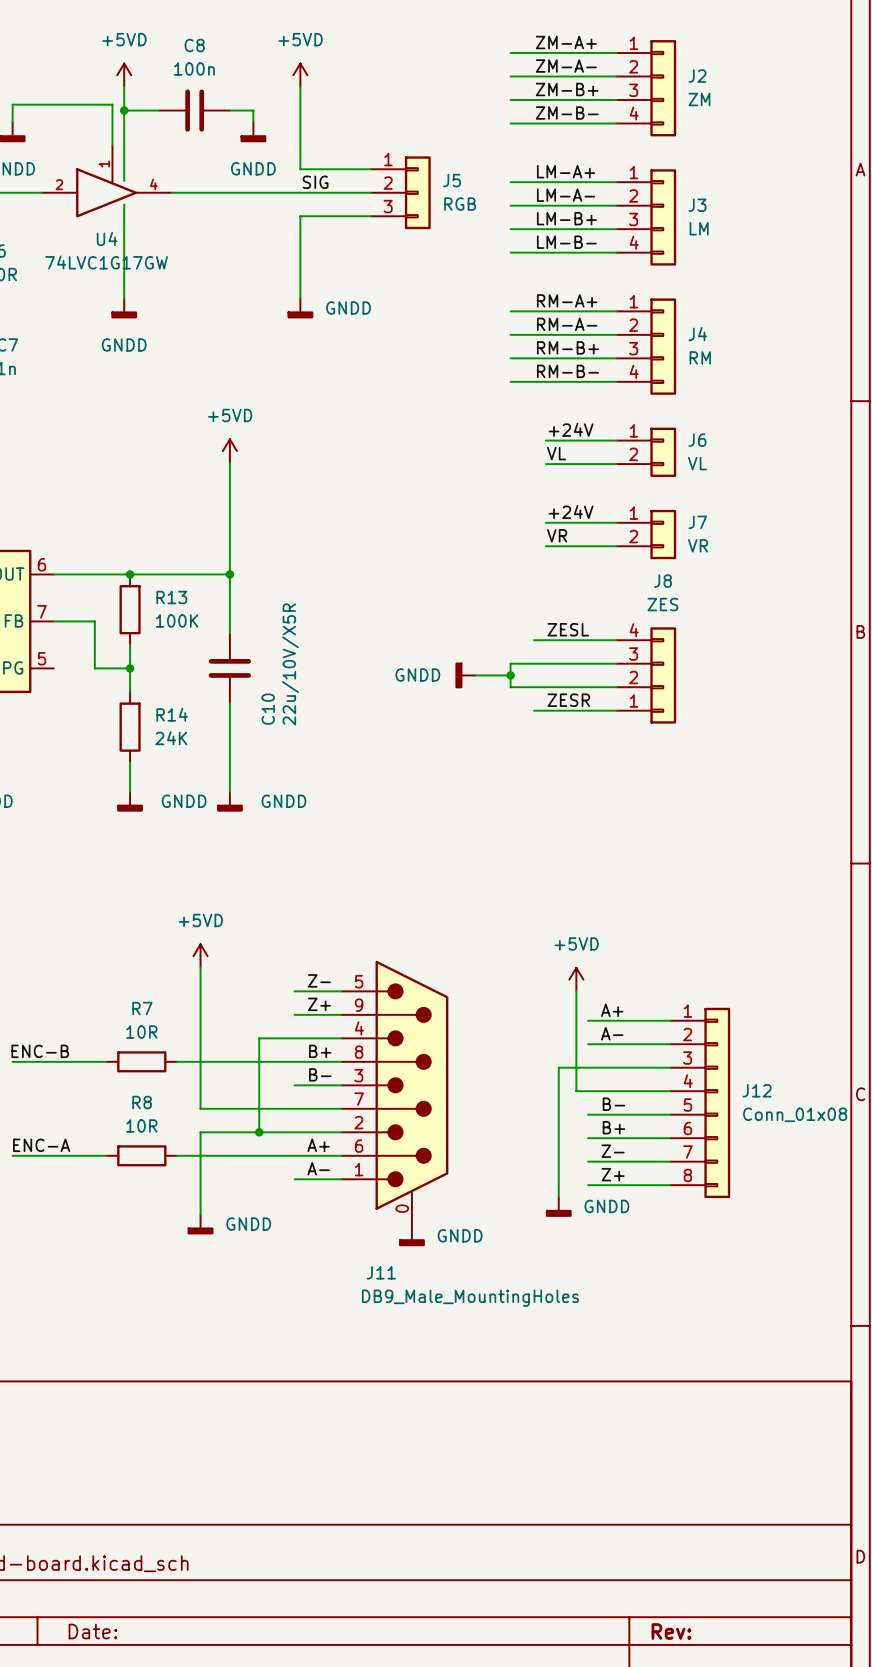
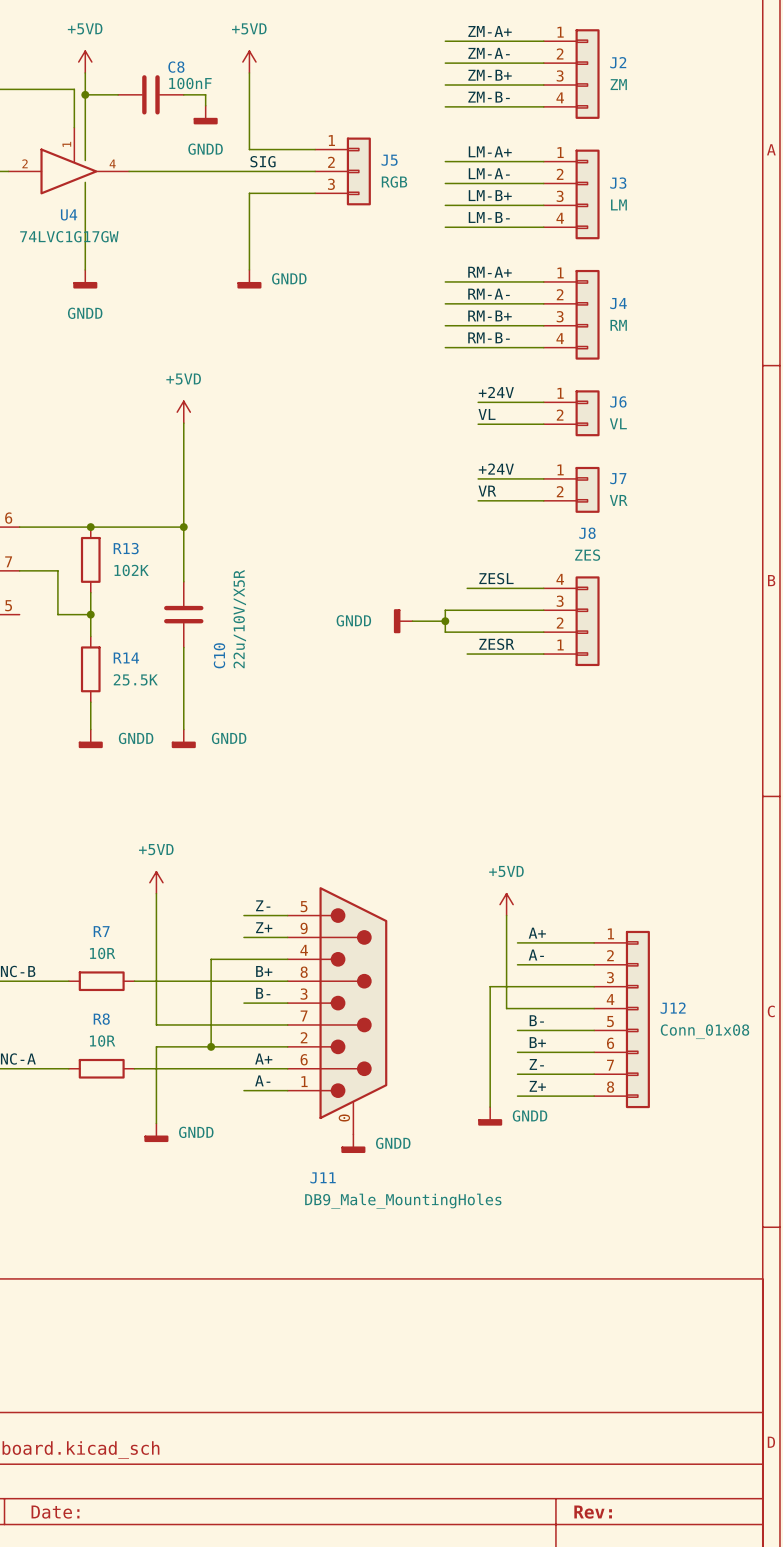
C8 name position: C8 (194, 45) -> C8 (176, 67)
C8 value: 100n (194, 69) -> 100nF (190, 83)
R13 value: 100K (177, 620) -> 102K (131, 570)
R14 value: 24K (171, 738) -> 25.5K (135, 679)

